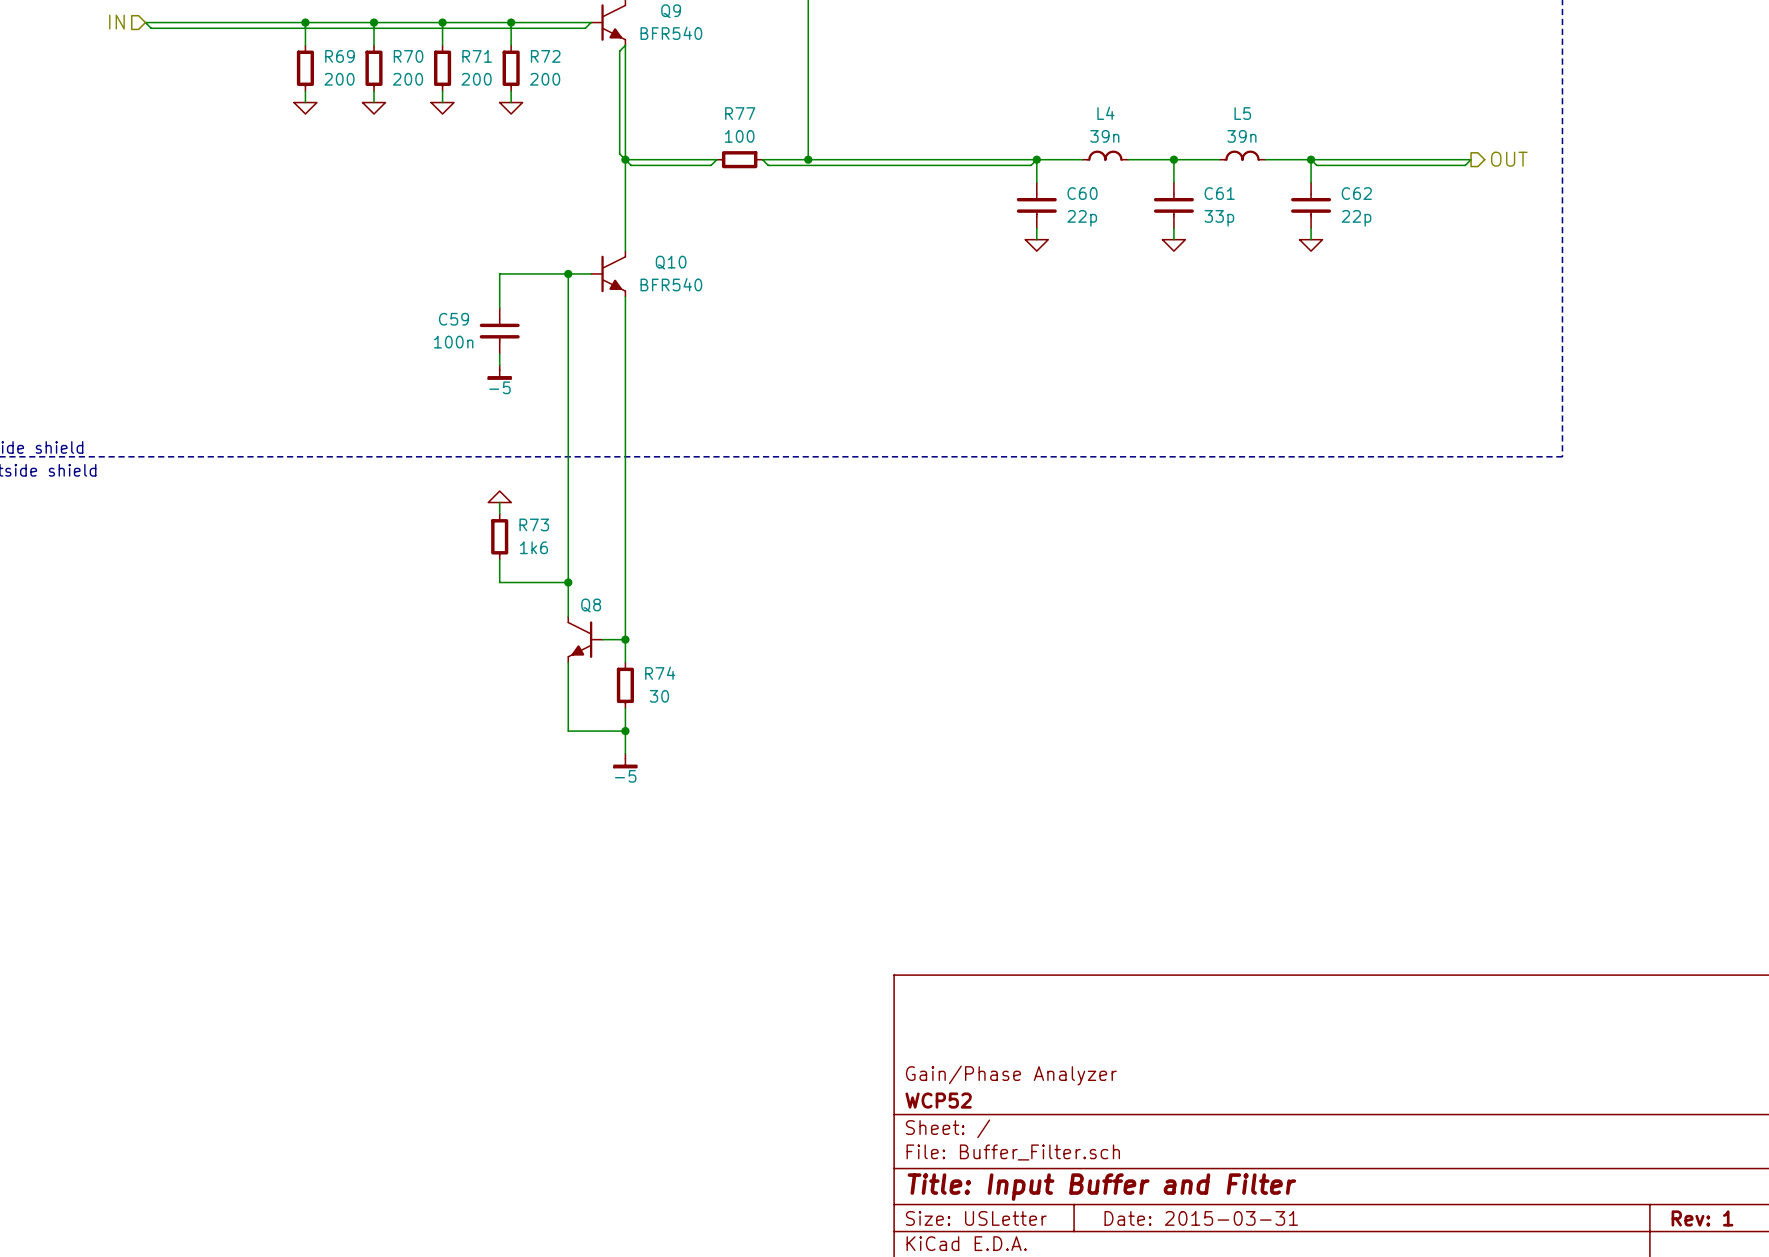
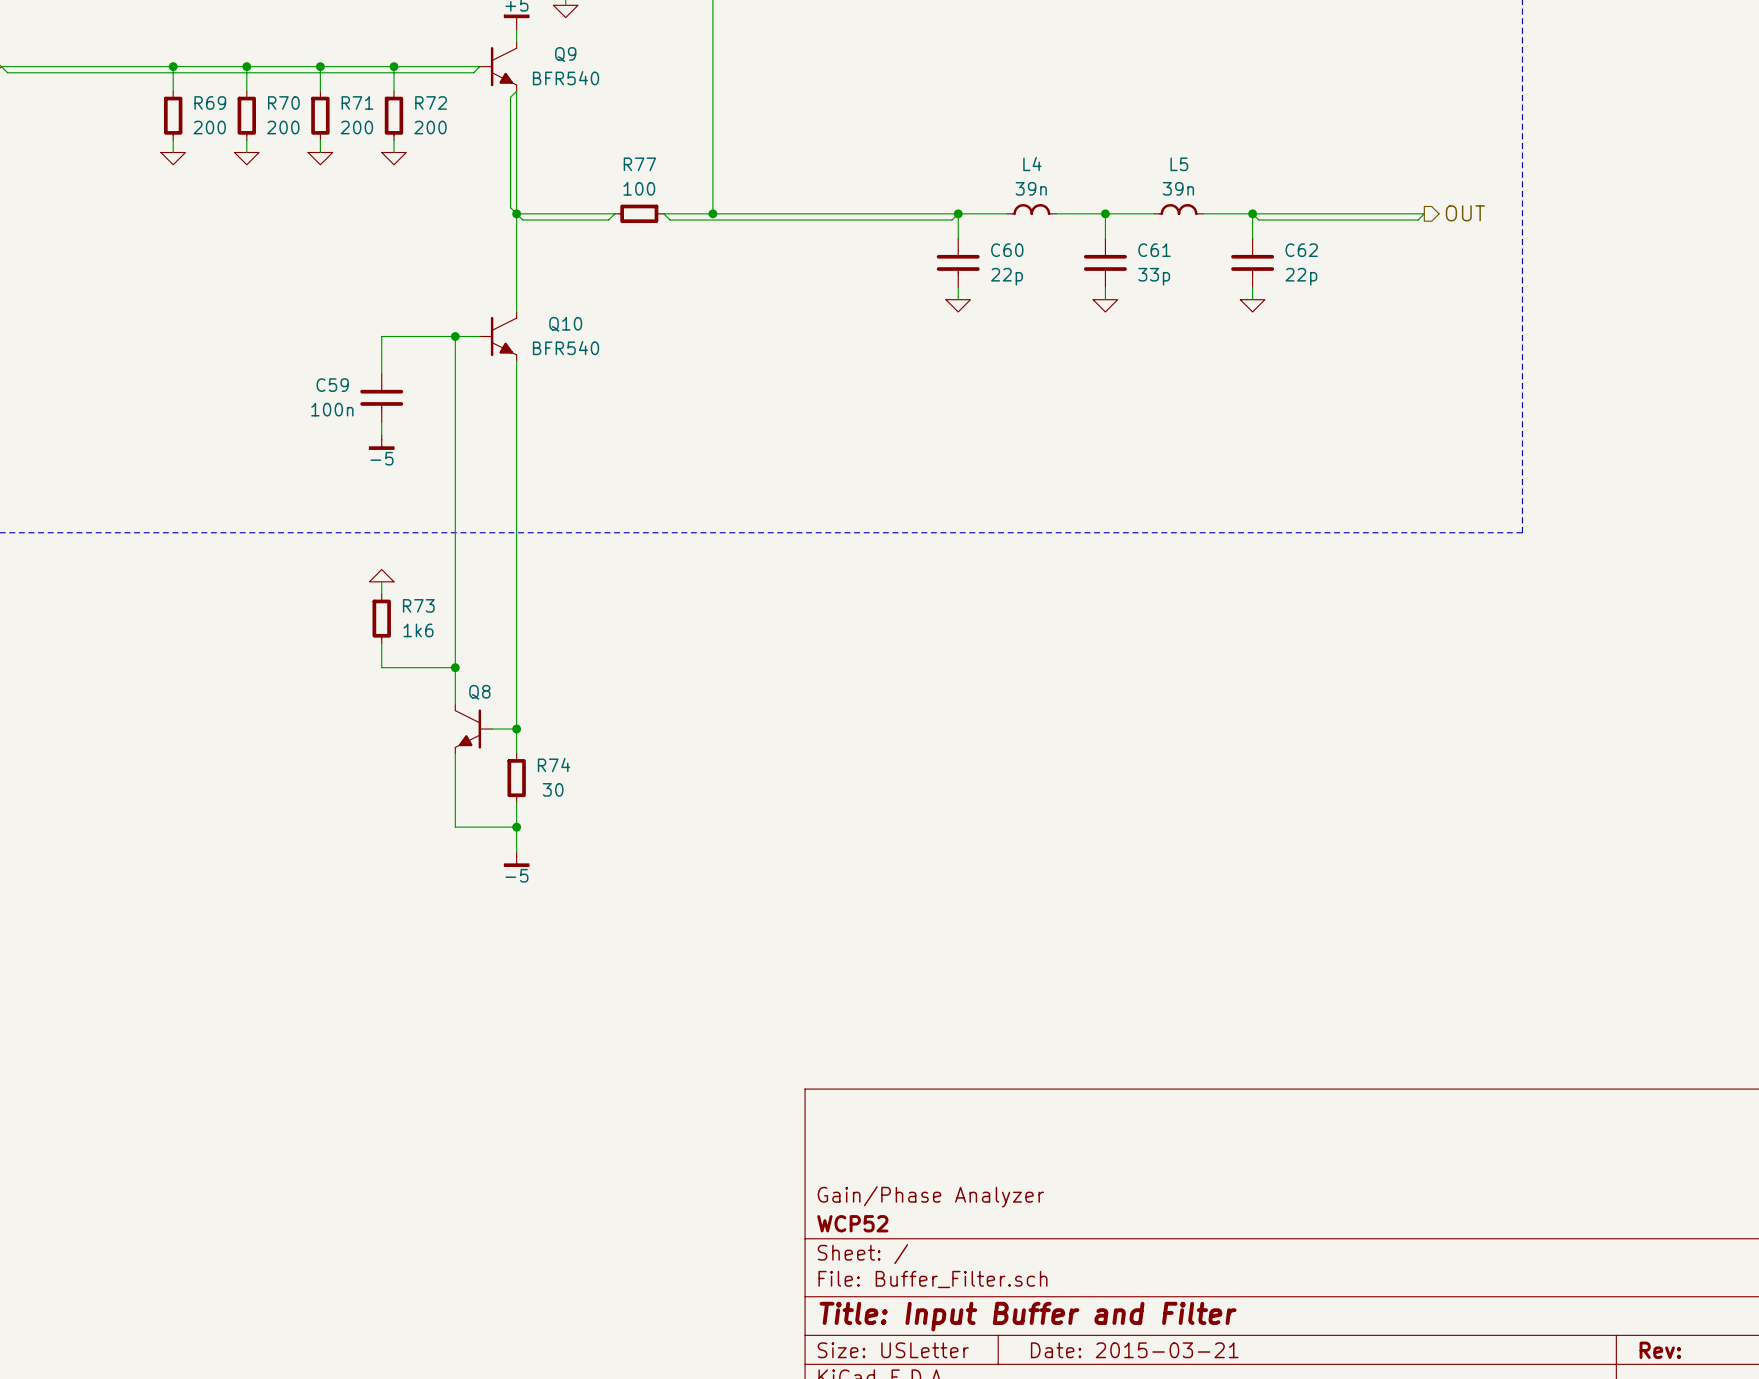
title block: Date: 2015-03-31 (1201, 1218) -> Date: 2015-03-21 (1134, 1350)
title block: Rev: 1 (1702, 1218) -> Rev: (1660, 1350)

